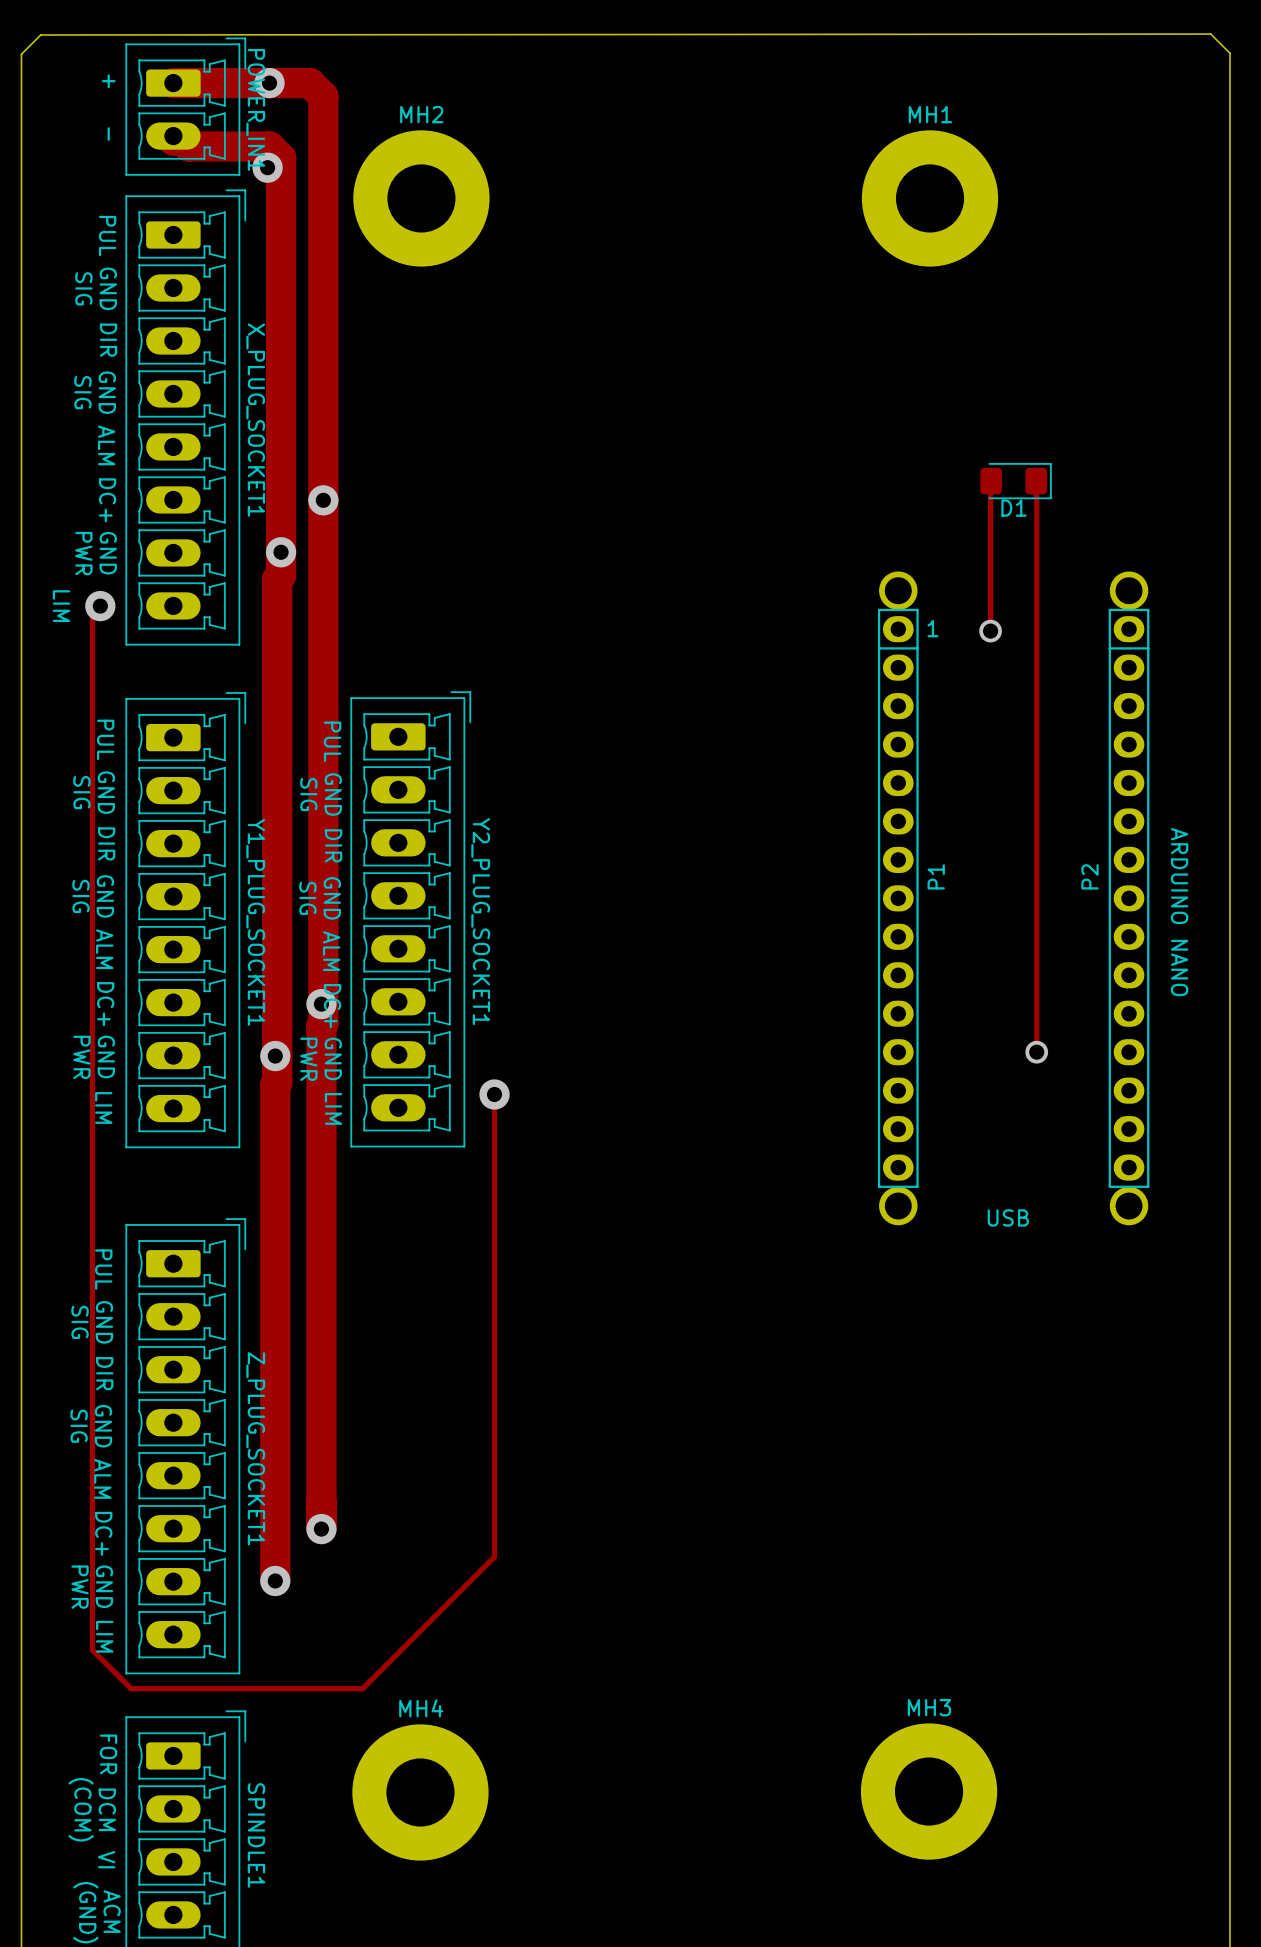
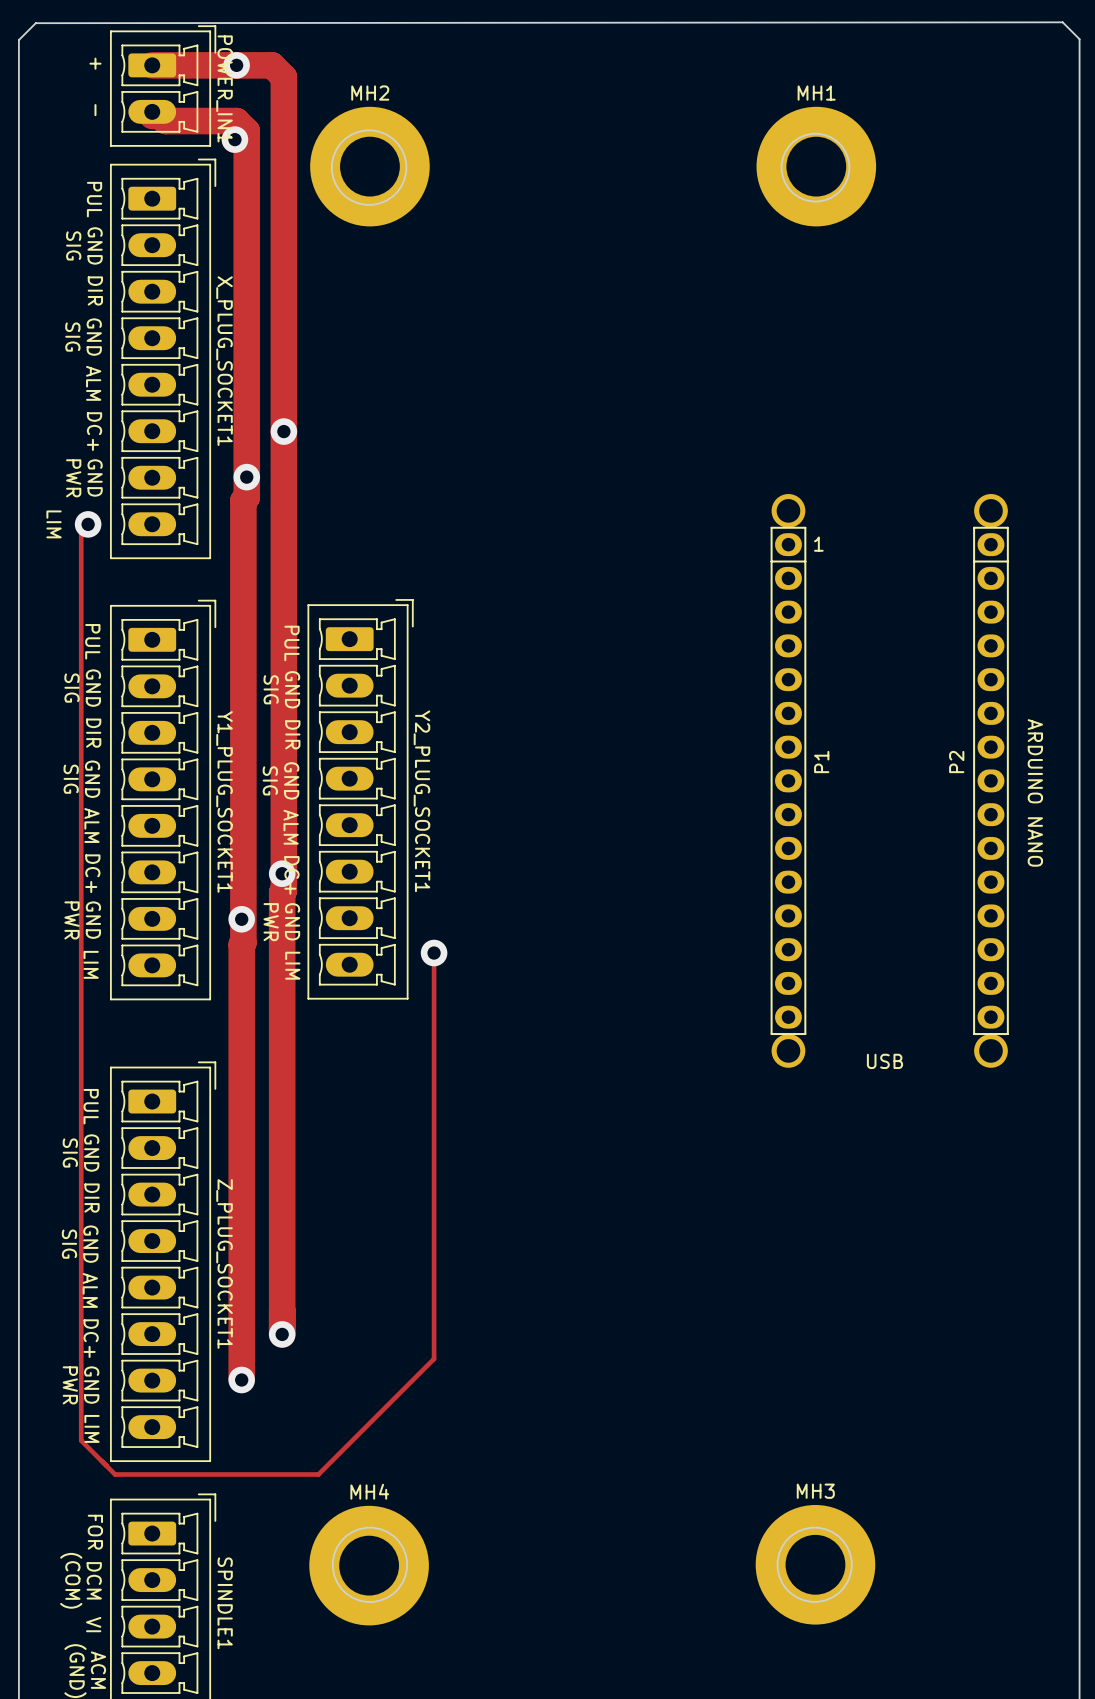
track: (991, 481) (990, 631) -> none
D1: (1016, 481) -> none
track: (1036, 481) (1036, 1054) -> none
via: (990, 631) -> none
via: (1036, 1052) -> none

